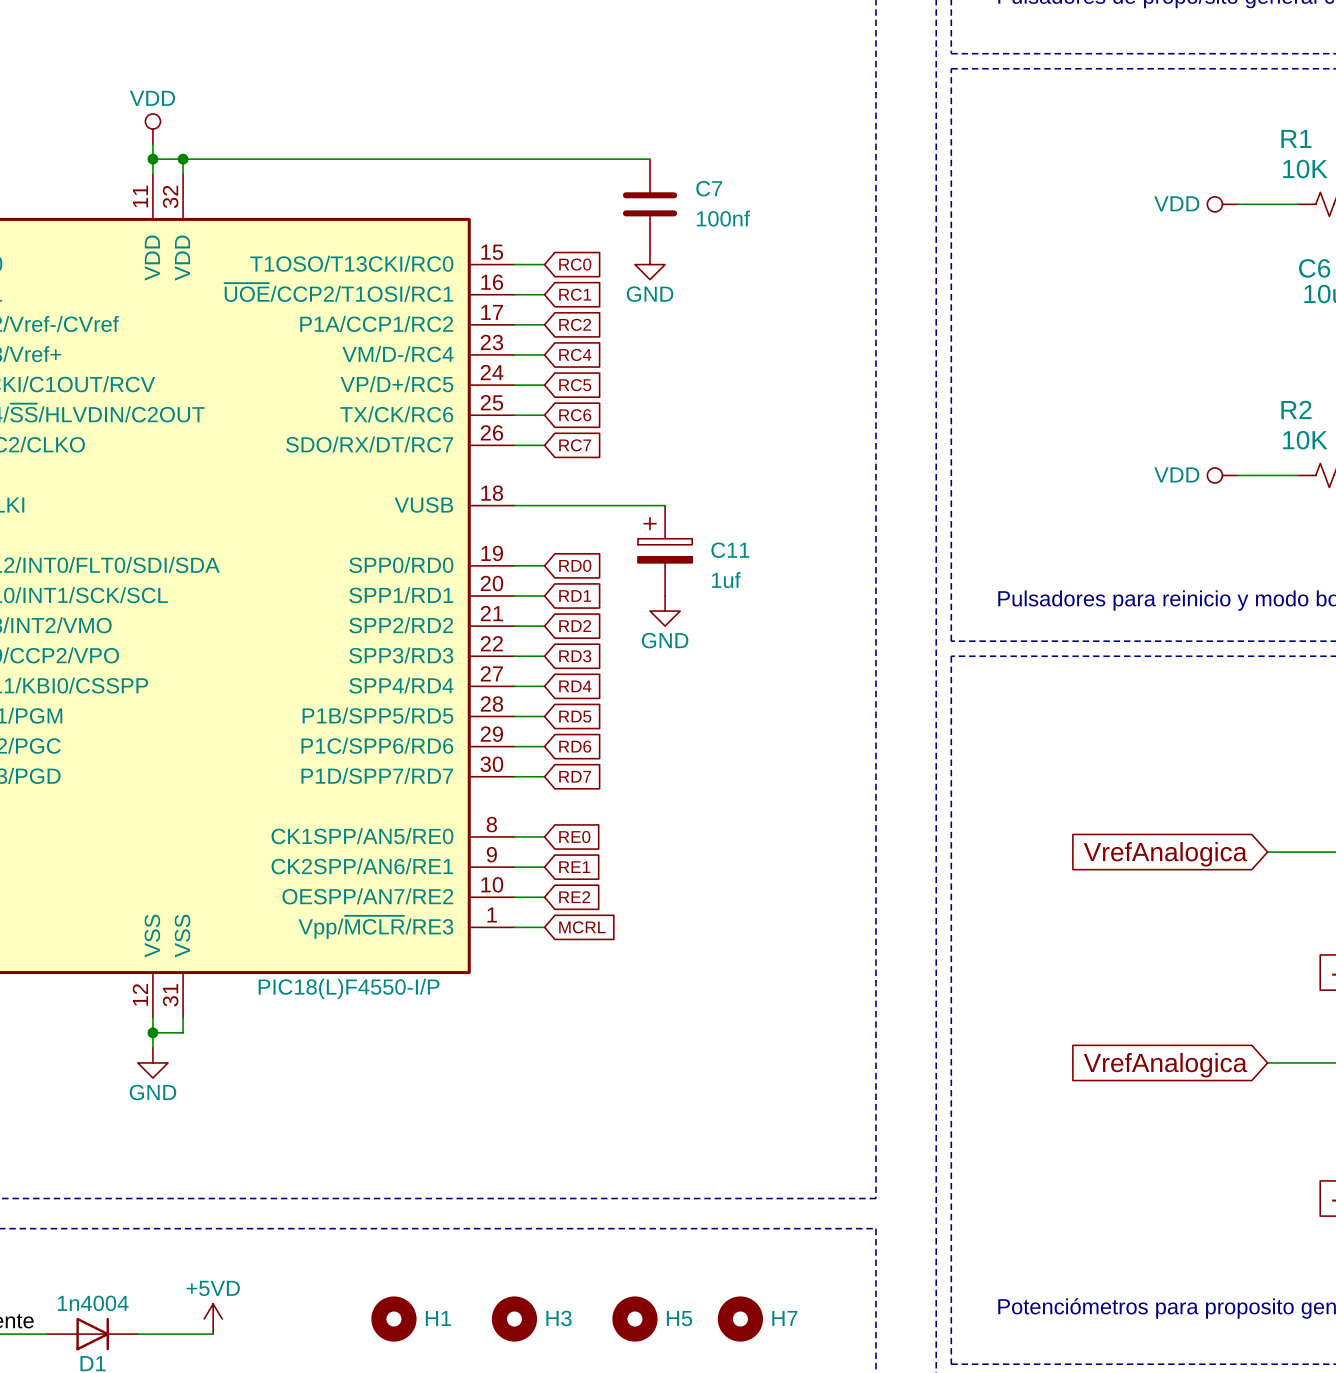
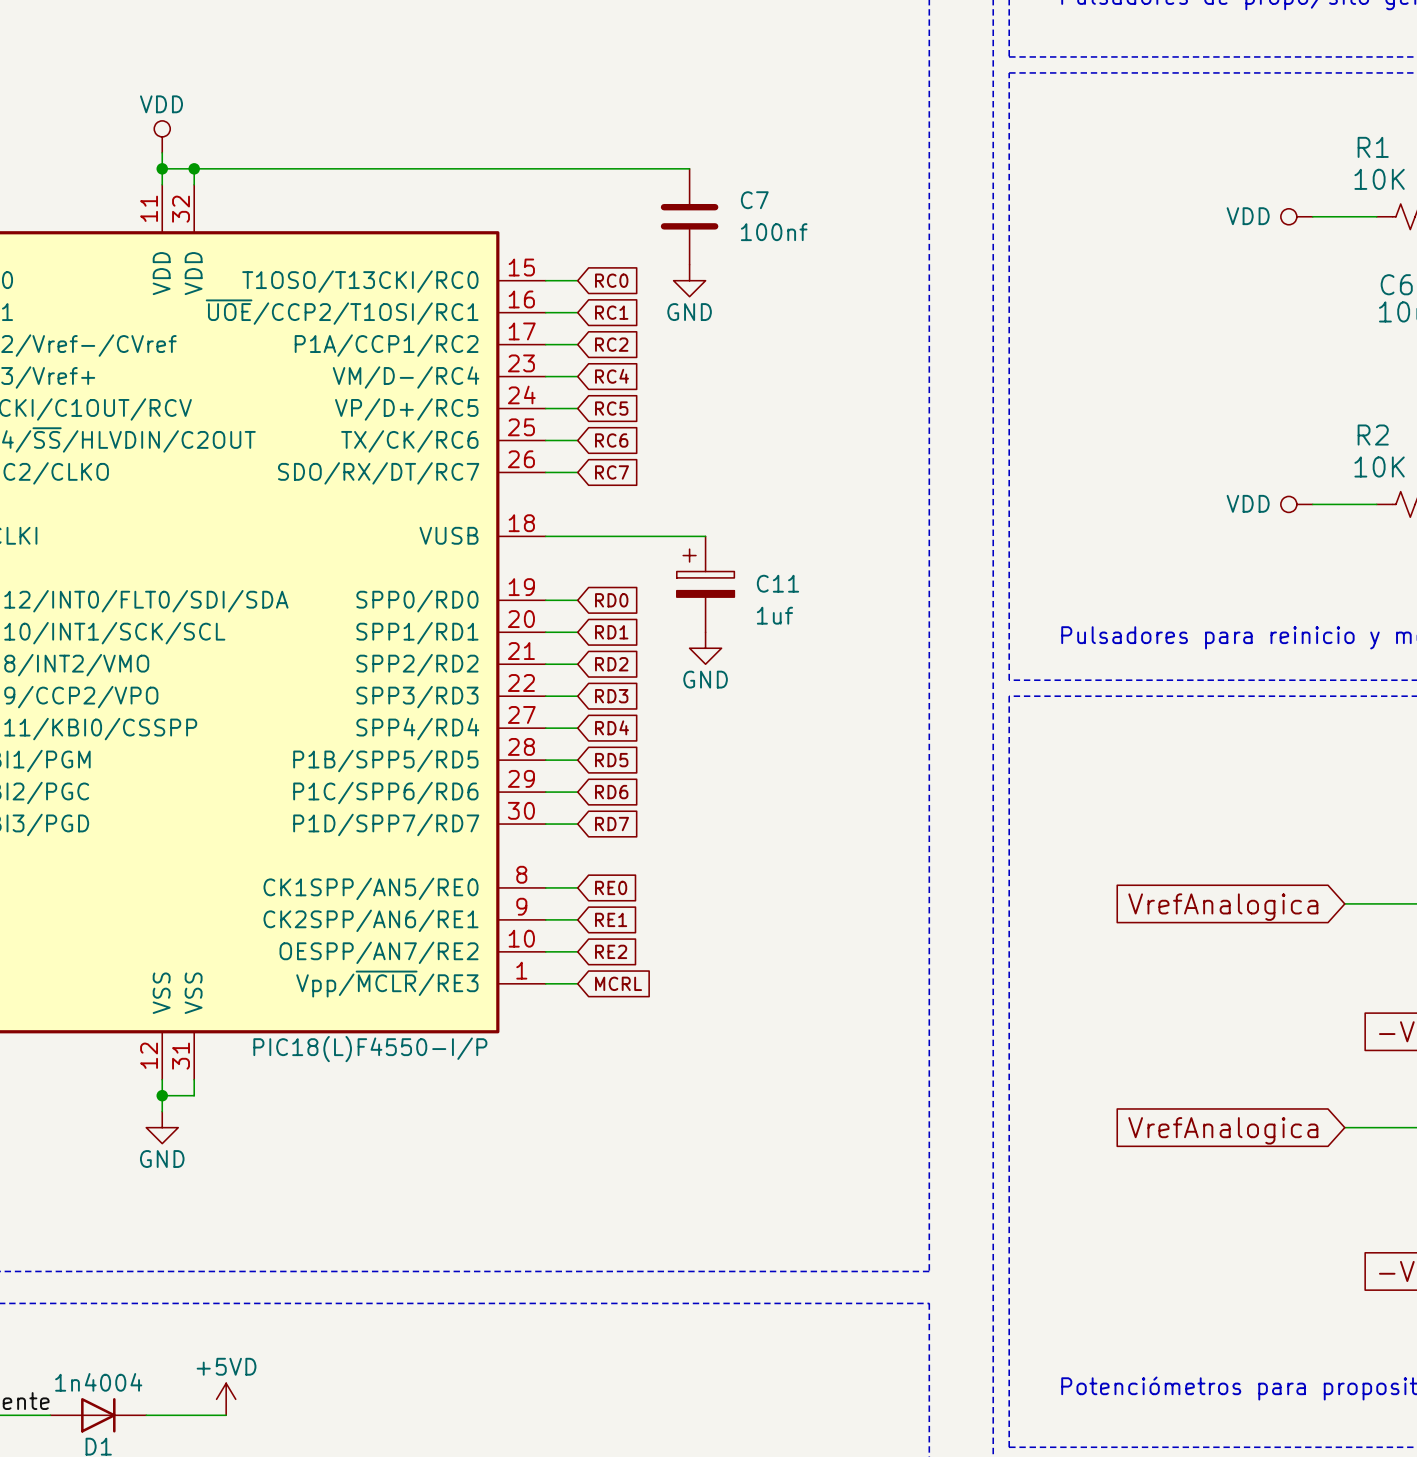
H1: (393, 1319) -> none
H3: (514, 1319) -> none
H5: (634, 1319) -> none
H7: (740, 1319) -> none

